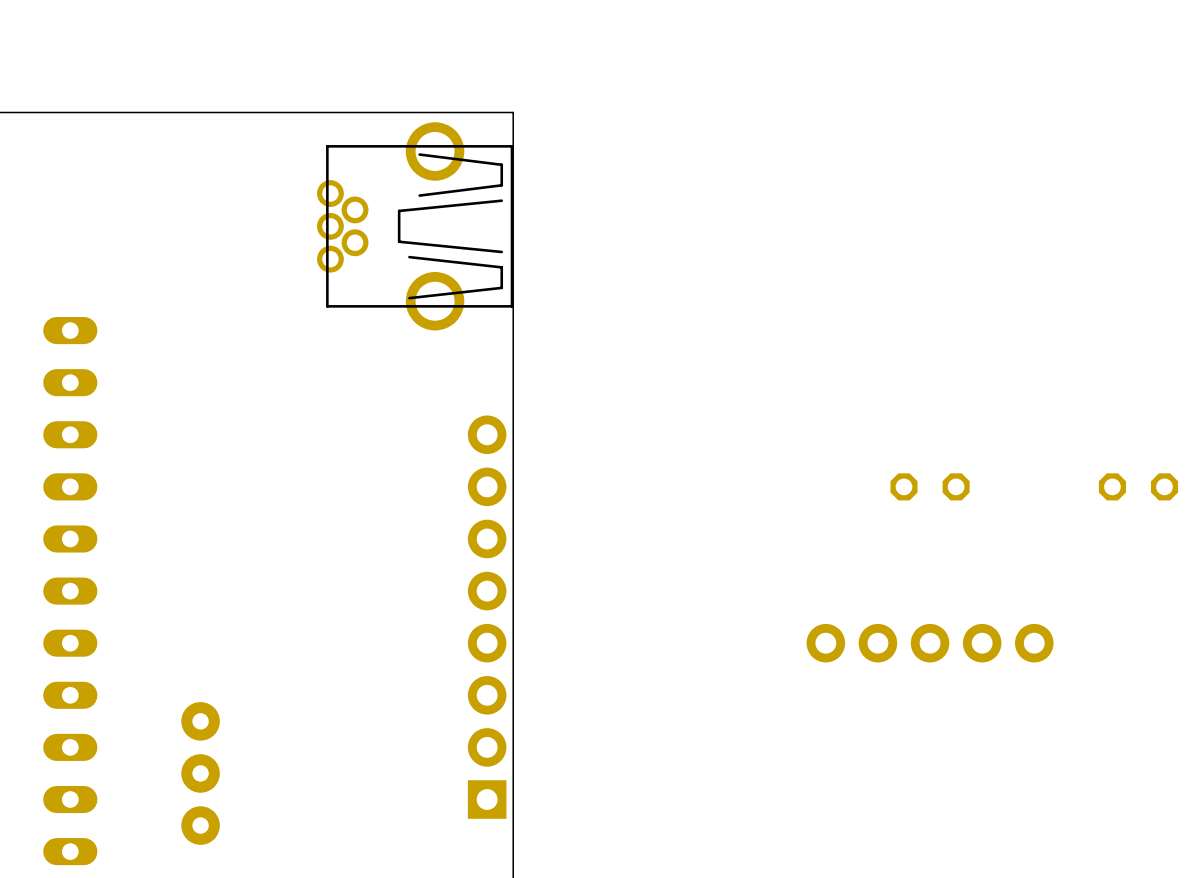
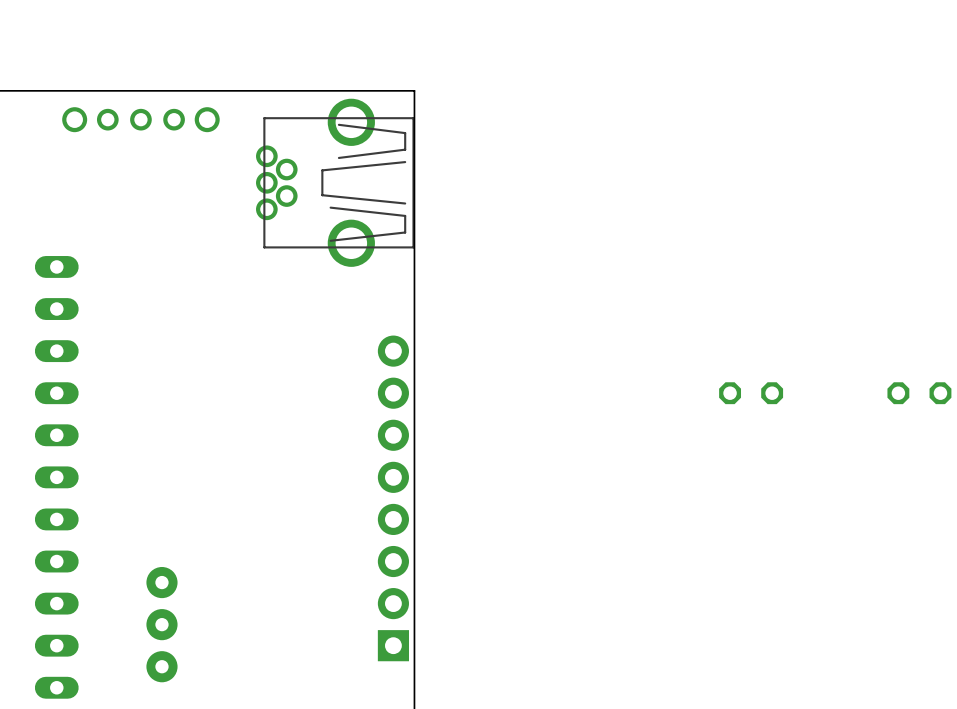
part: none -> (140, 119)
part: (930, 643) -> none

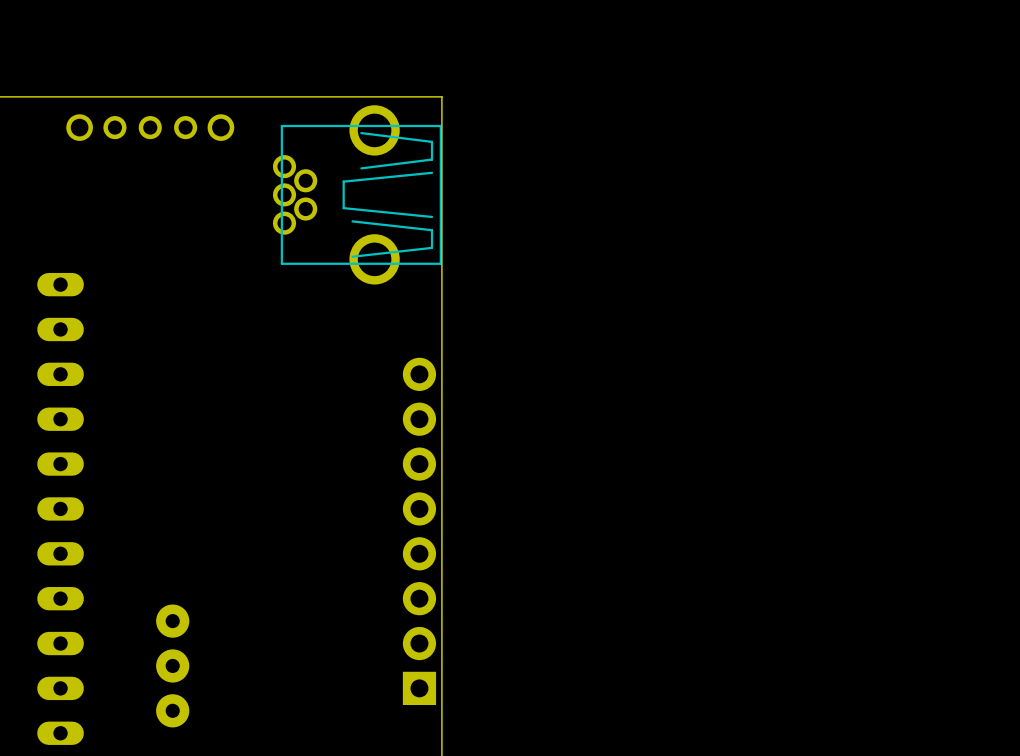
part: (751, 393) -> none
part: (919, 393) -> none

